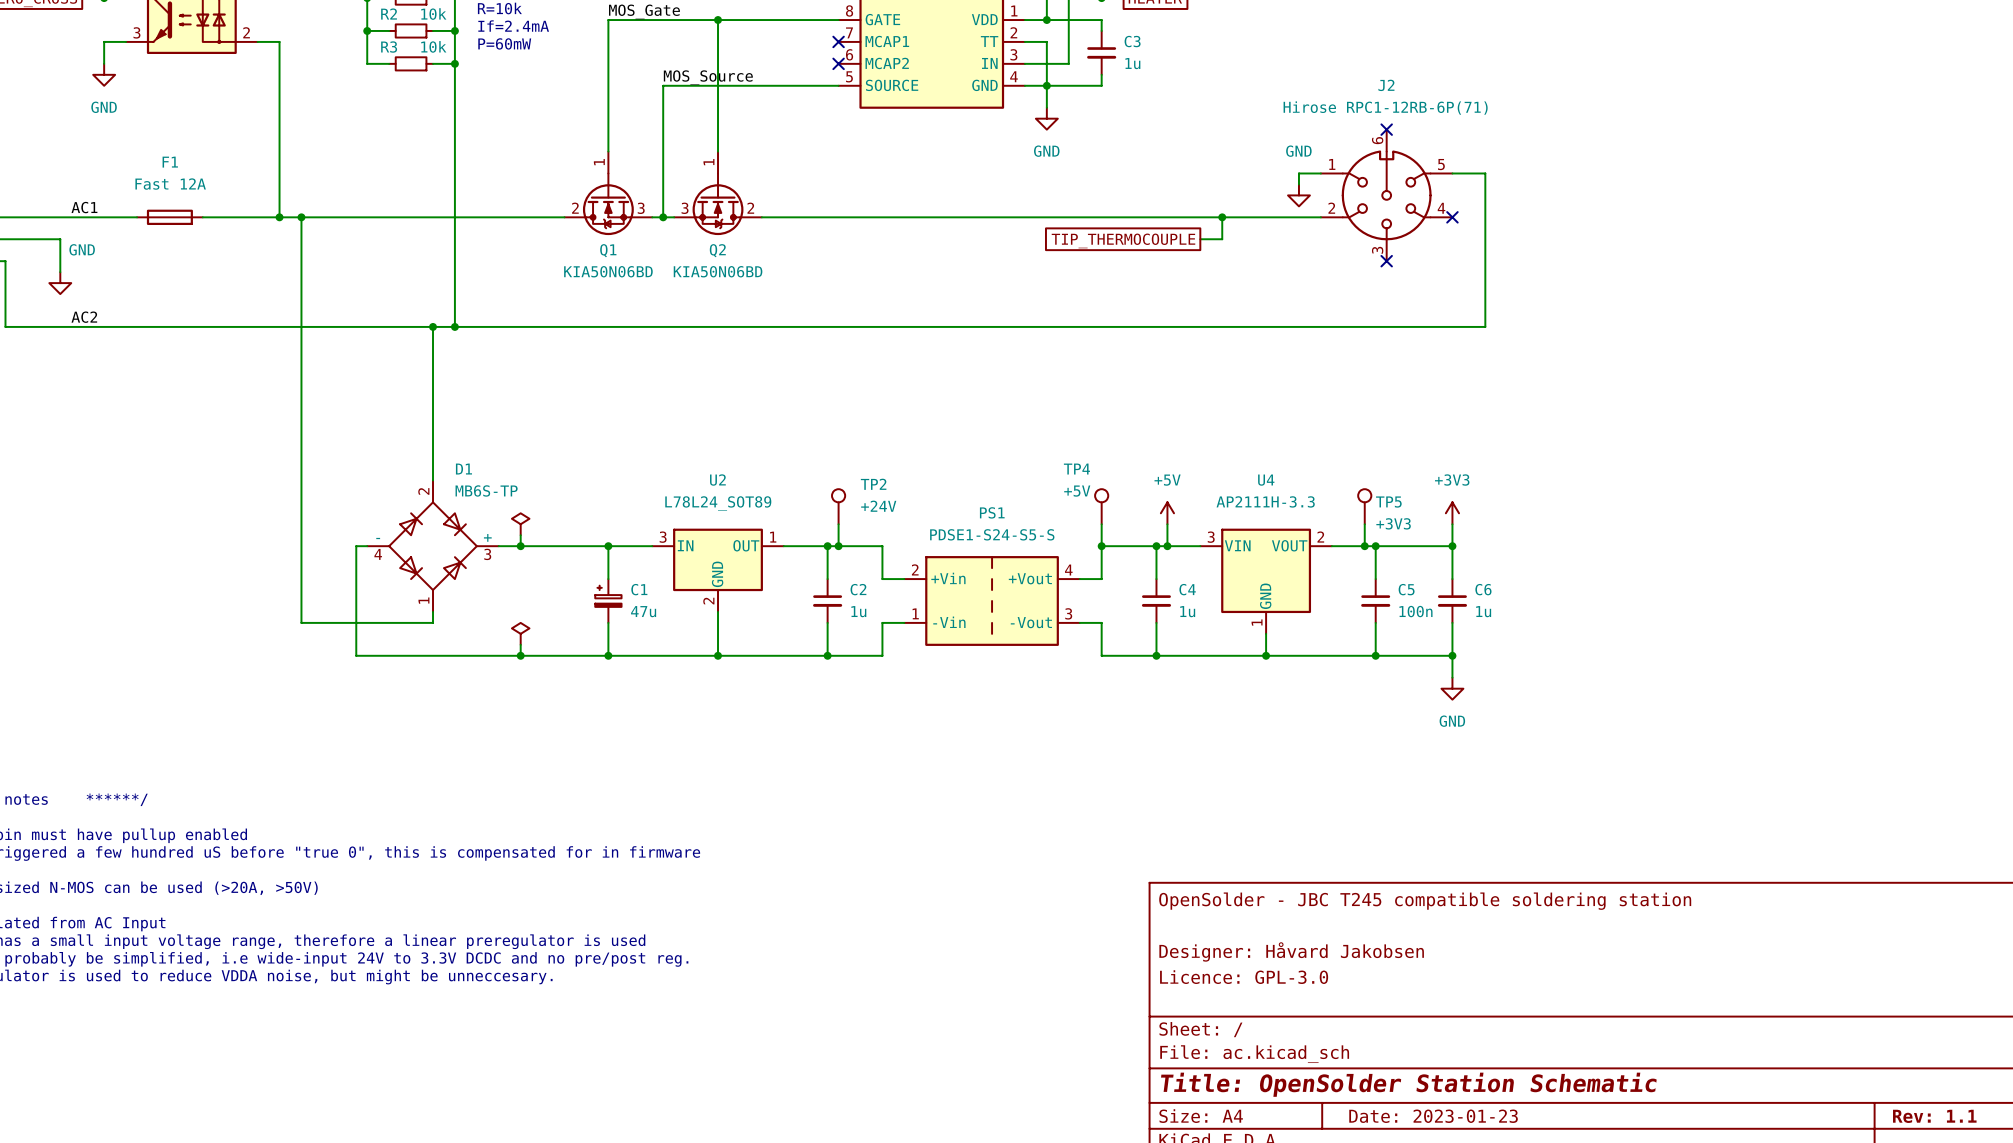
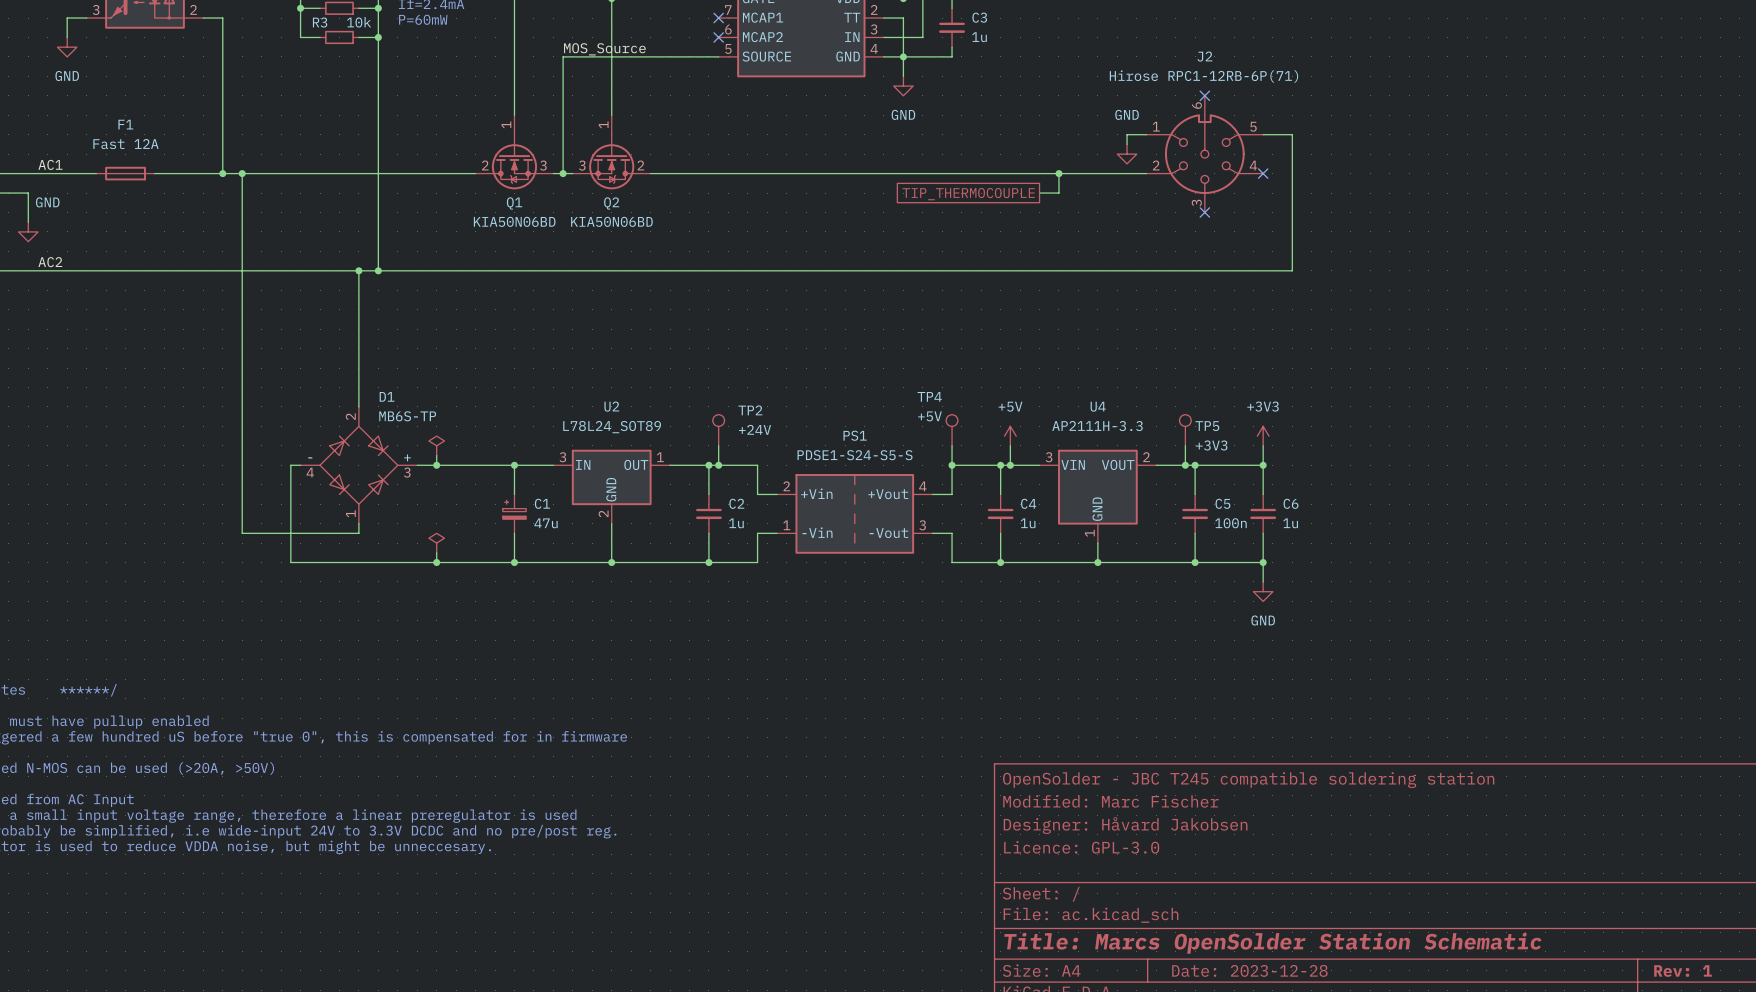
title block: none -> Modified: Marc Fischer (1110, 801)
title block: Title: OpenSolder Station Schematic (1408, 1084) -> Title: Marcs OpenSolder Station Schematic (1272, 943)
title block: Date: 2023-01-23 (1433, 1116) -> Date: 2023-12-28 (1249, 970)
title block: Rev: 1.1 (1934, 1116) -> Rev: 1 (1683, 971)

